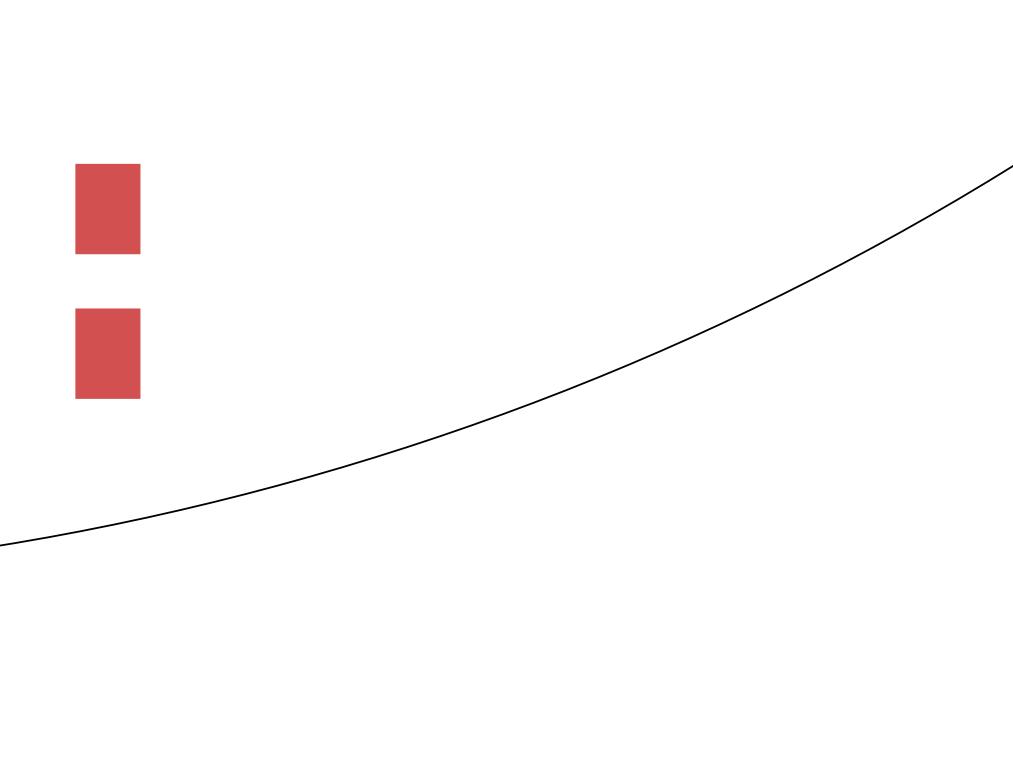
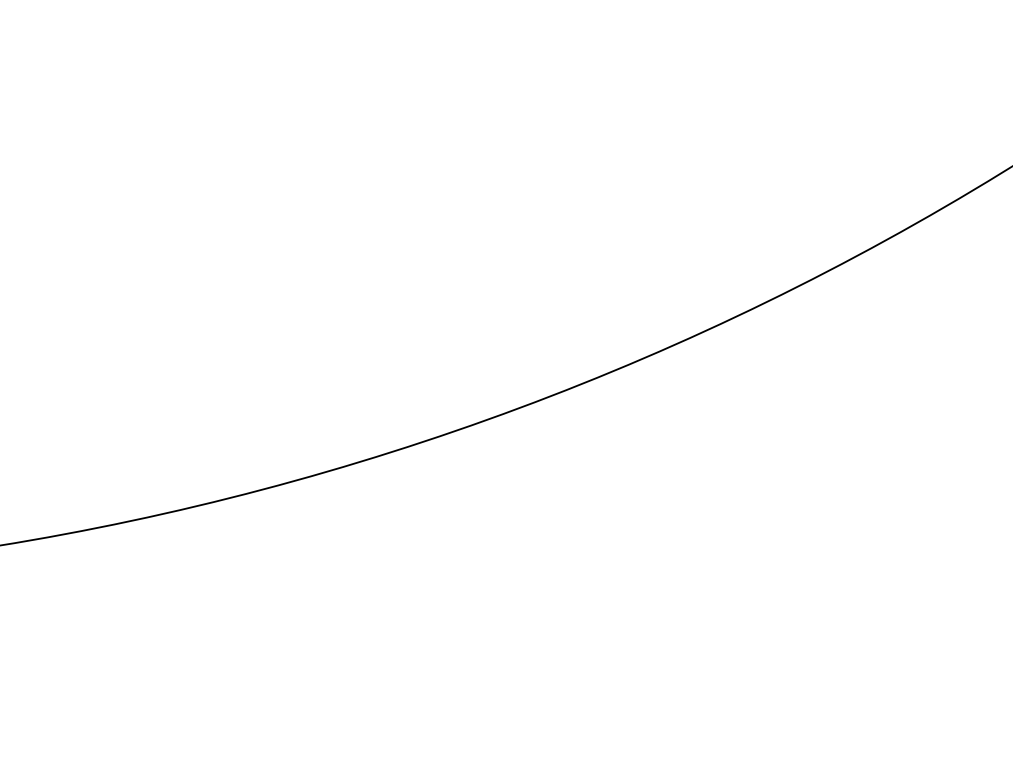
part: (107, 281) -> none

